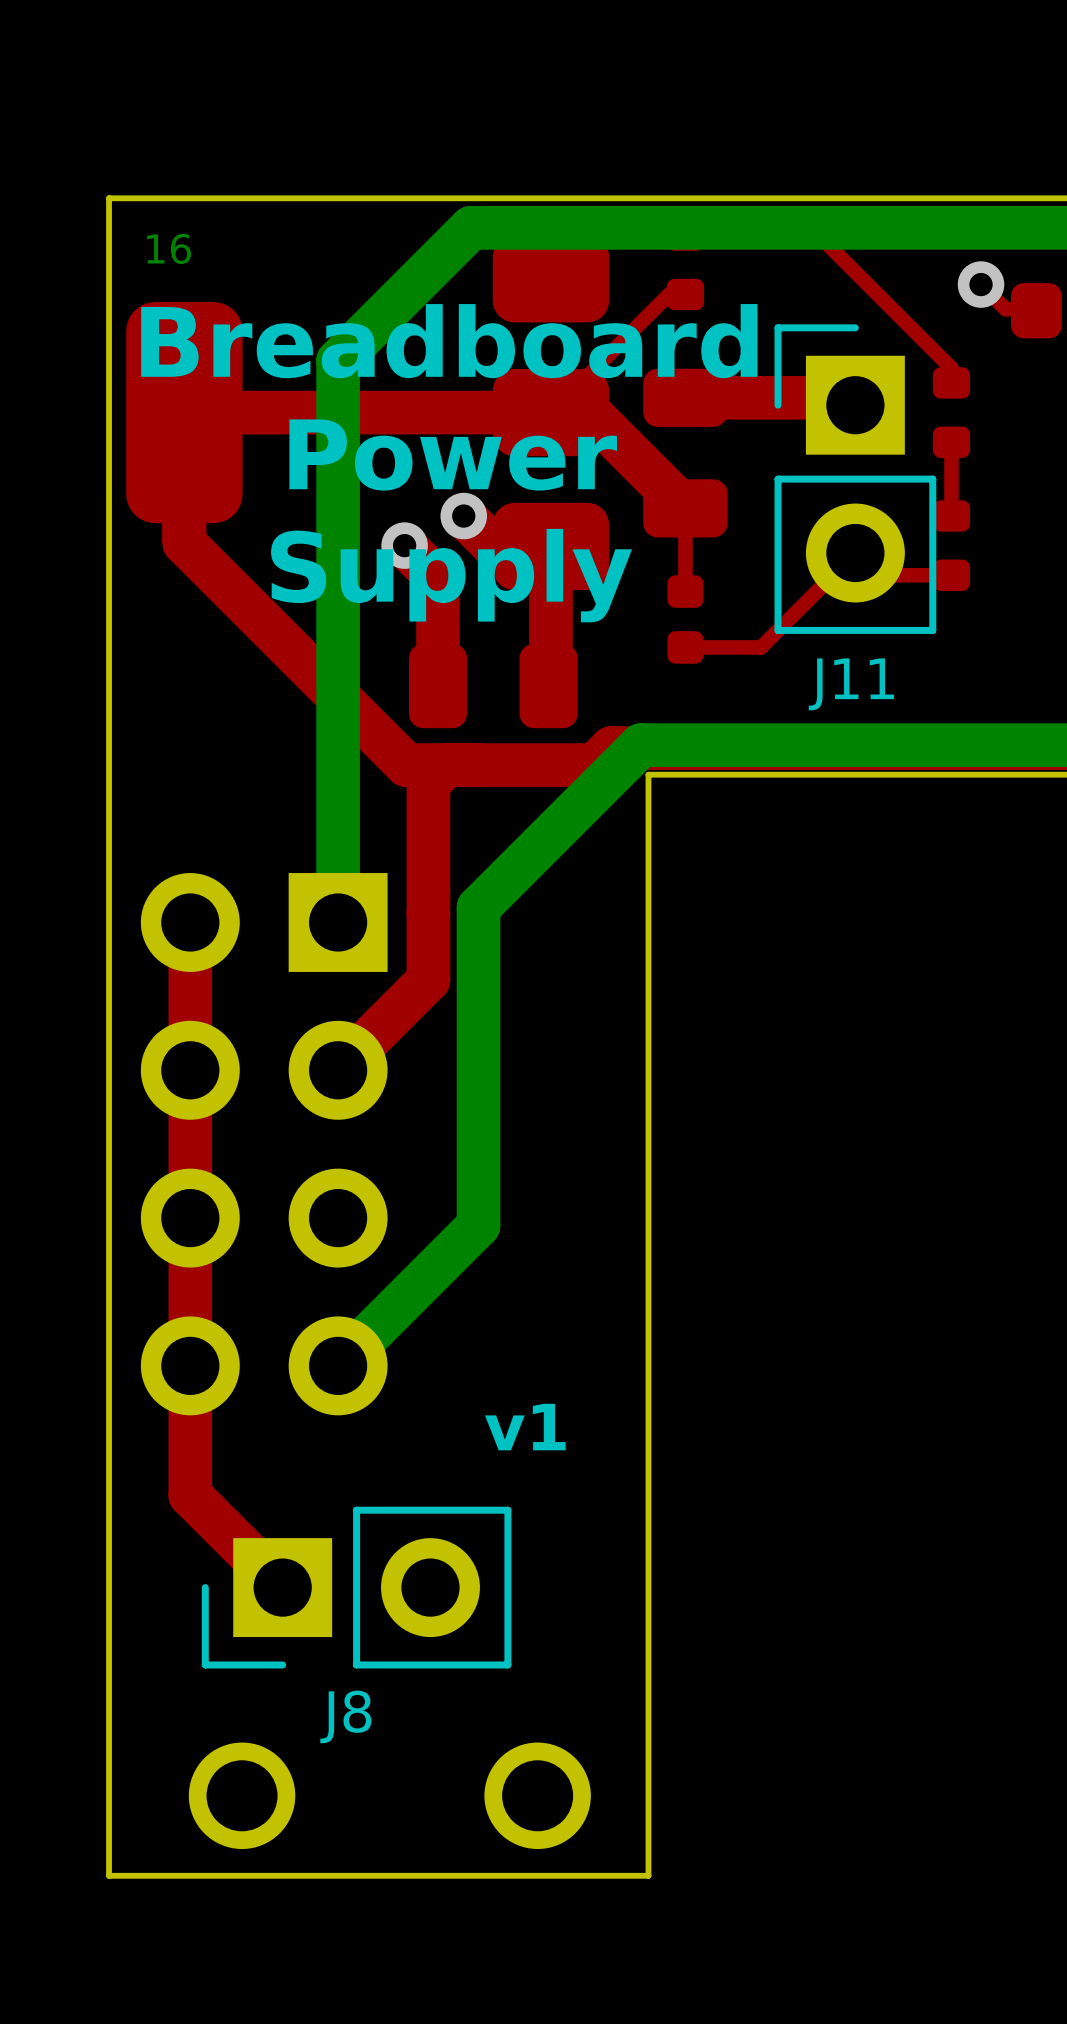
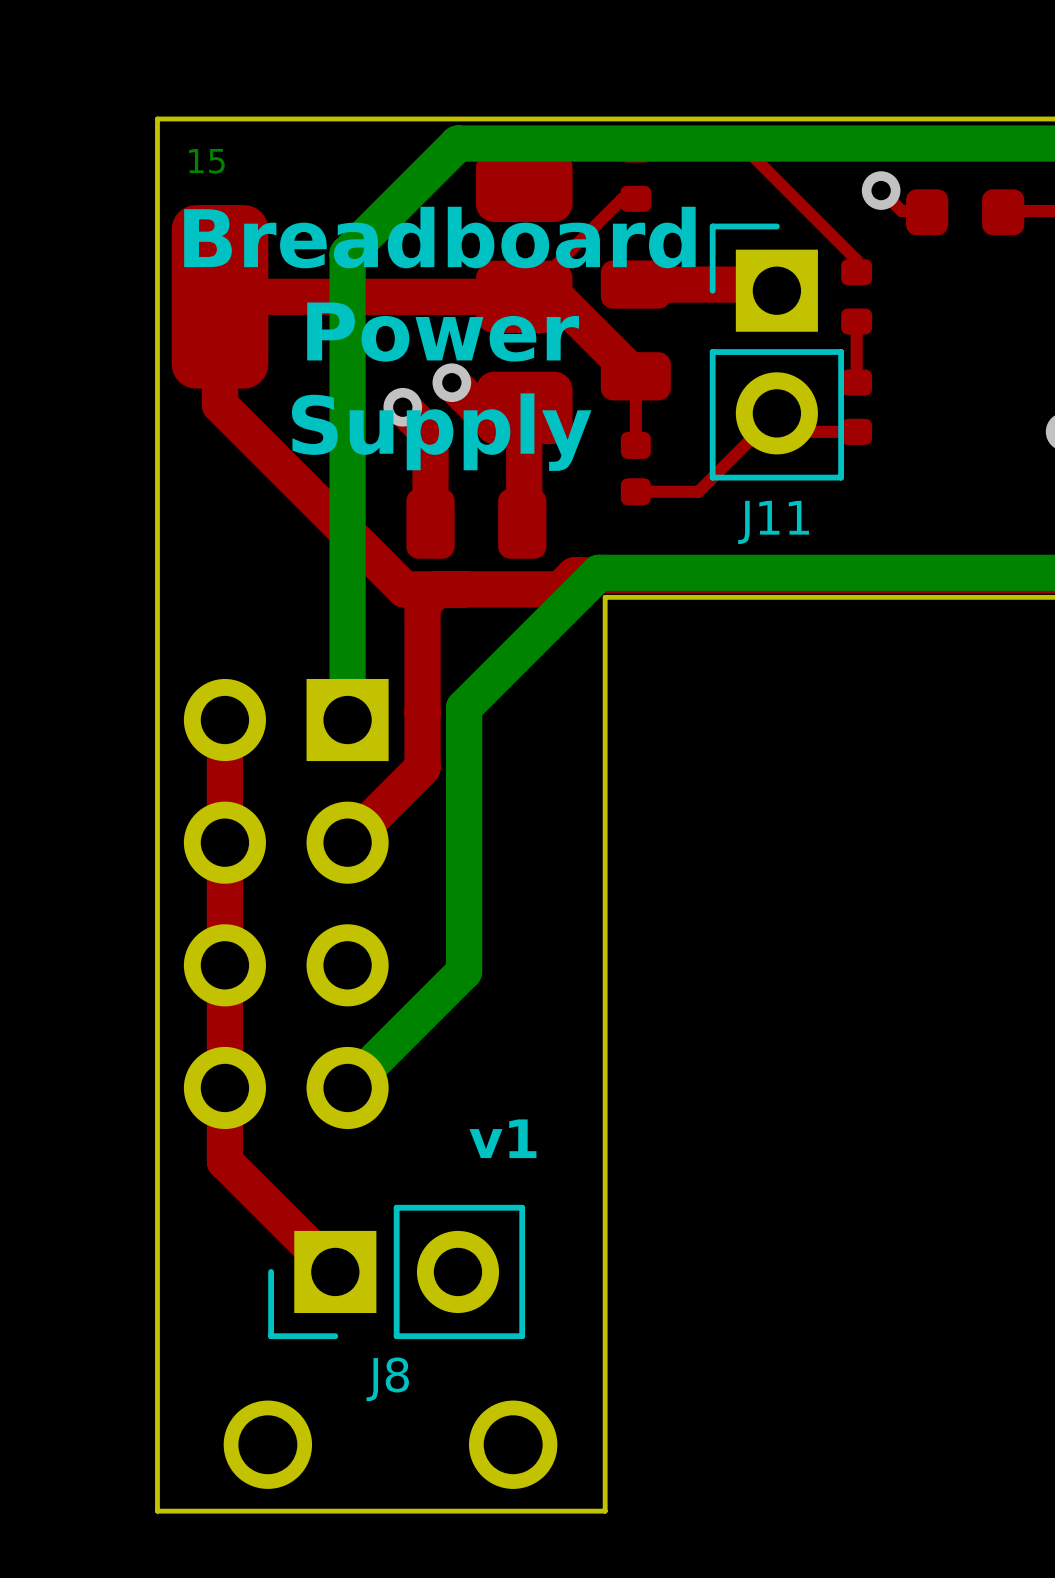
text: 16 (169, 248) -> 15 (206, 161)
top track: (190, 1454) (190, 1495) (282, 1587) -> (224, 1161) (335, 1271)
J8 position: (356, 1587) -> (396, 1271)

